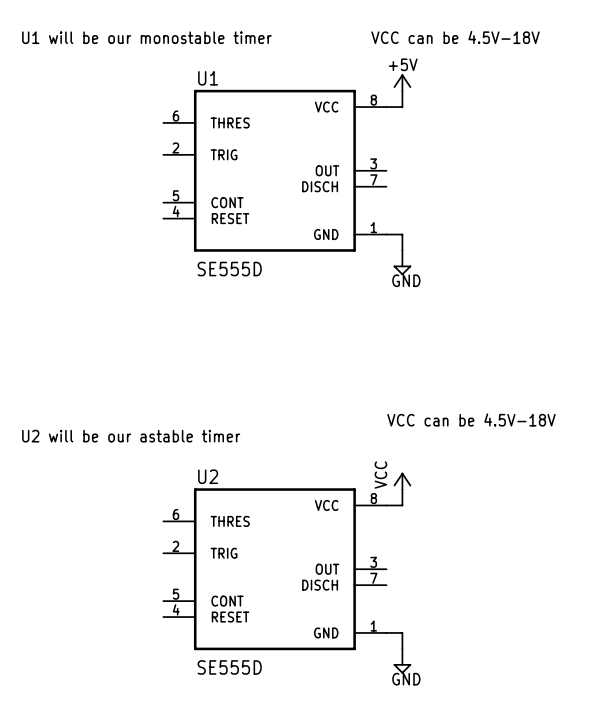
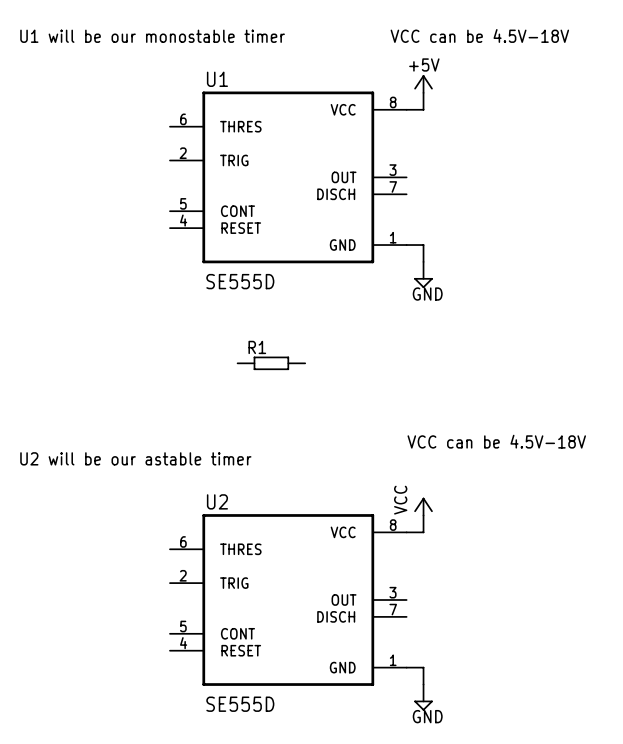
R1: none -> (271, 363)

